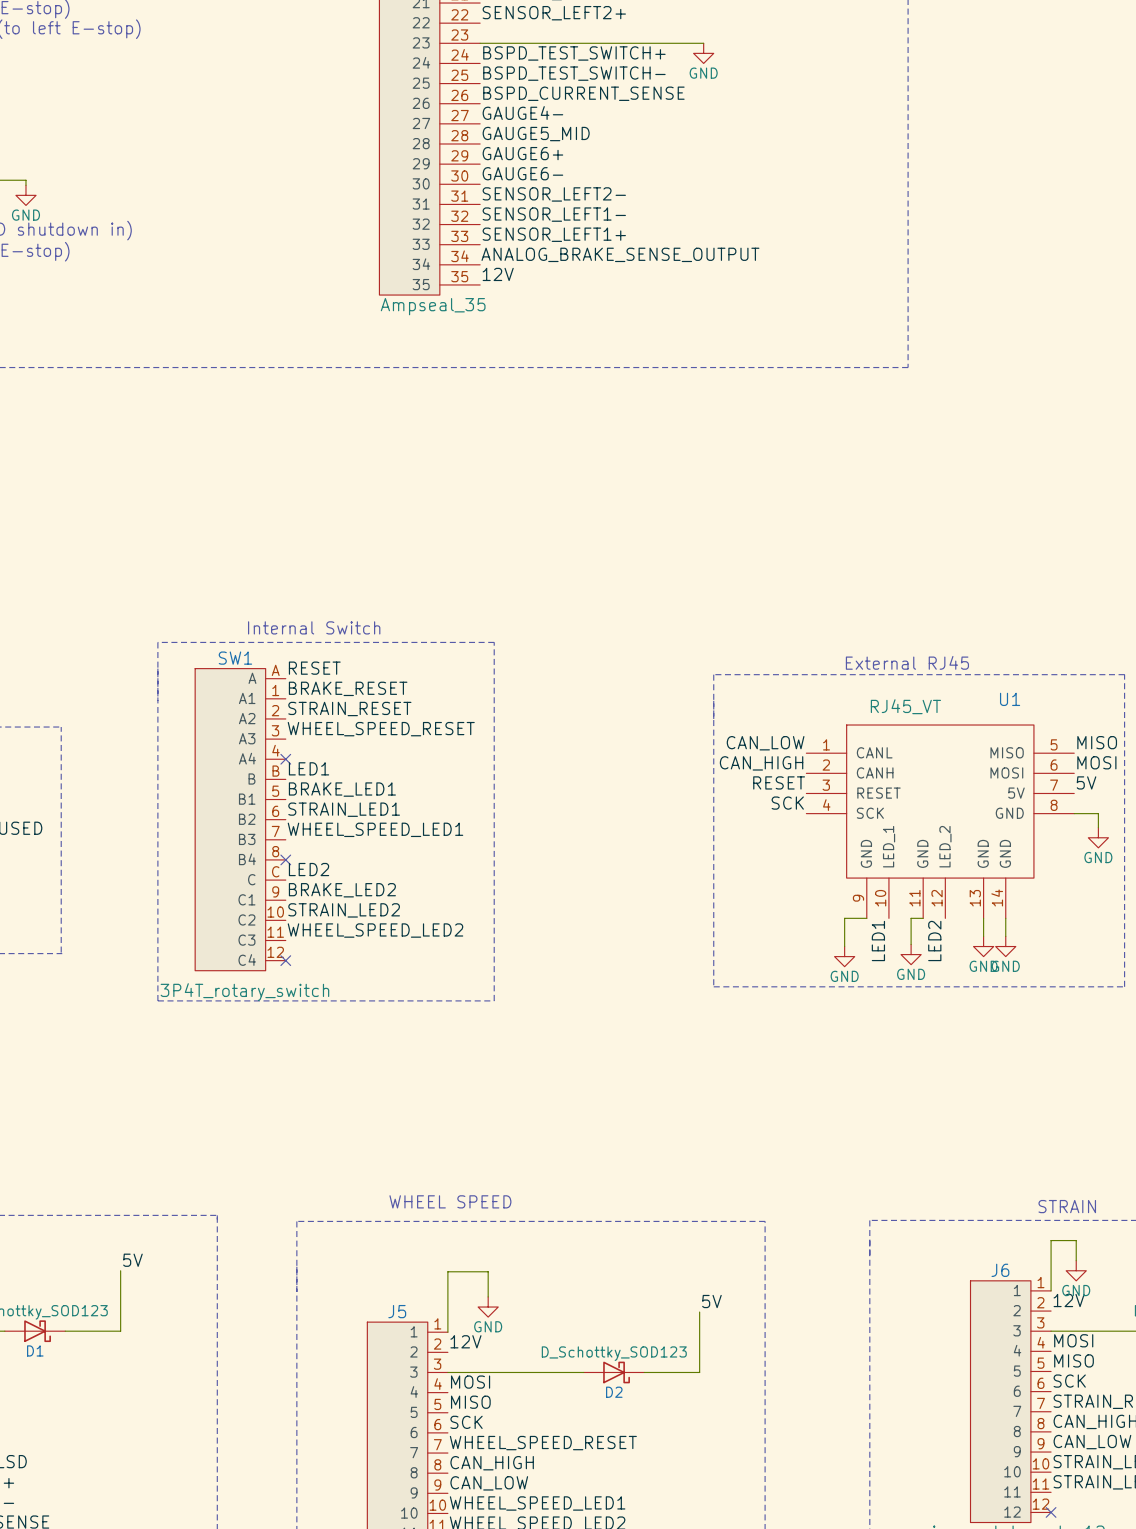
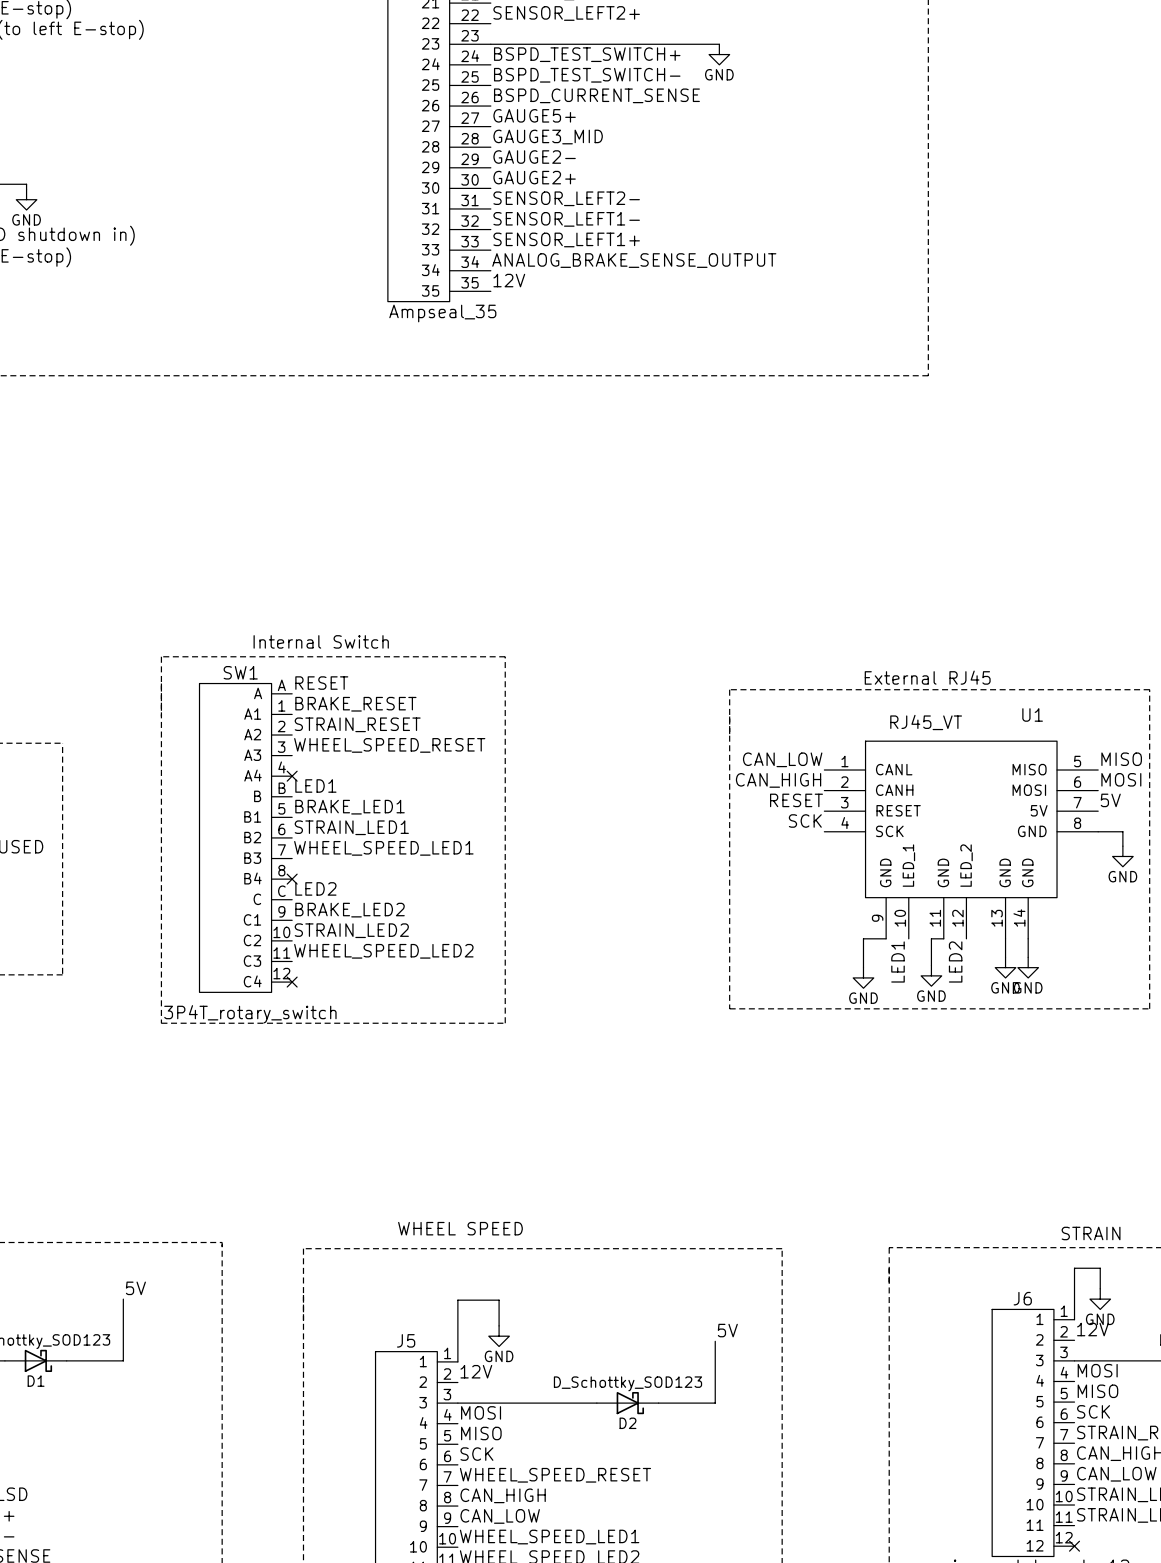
label: GAUGE4- (522, 113) -> GAUGE5+ (534, 115)
label: GAUGE5_MID (536, 134) -> GAUGE3_MID (548, 137)
label: GAUGE6+ (522, 153) -> GAUGE2- (534, 157)
label: GAUGE6- (522, 173) -> GAUGE2+ (534, 177)

